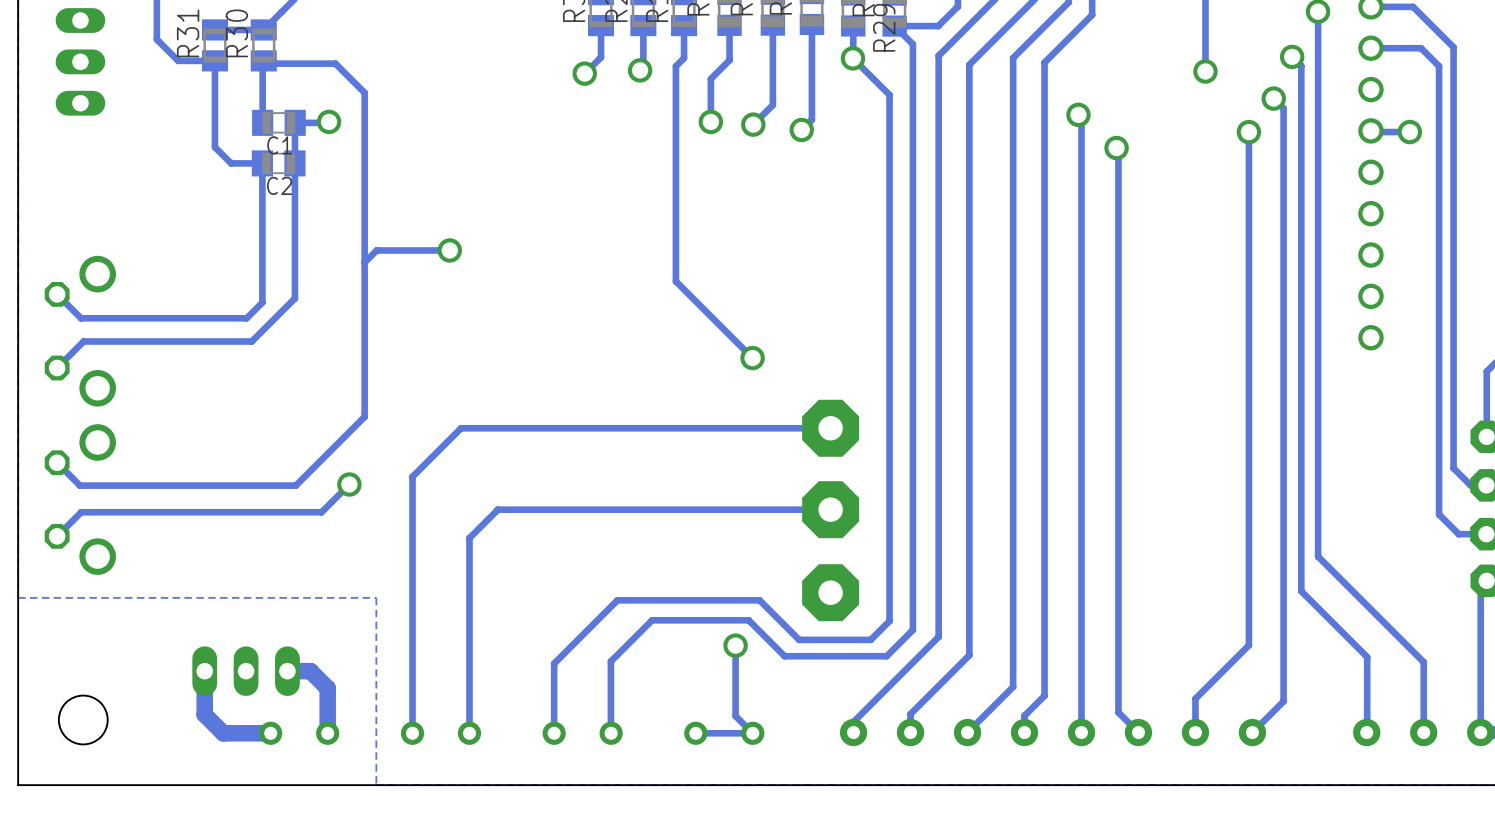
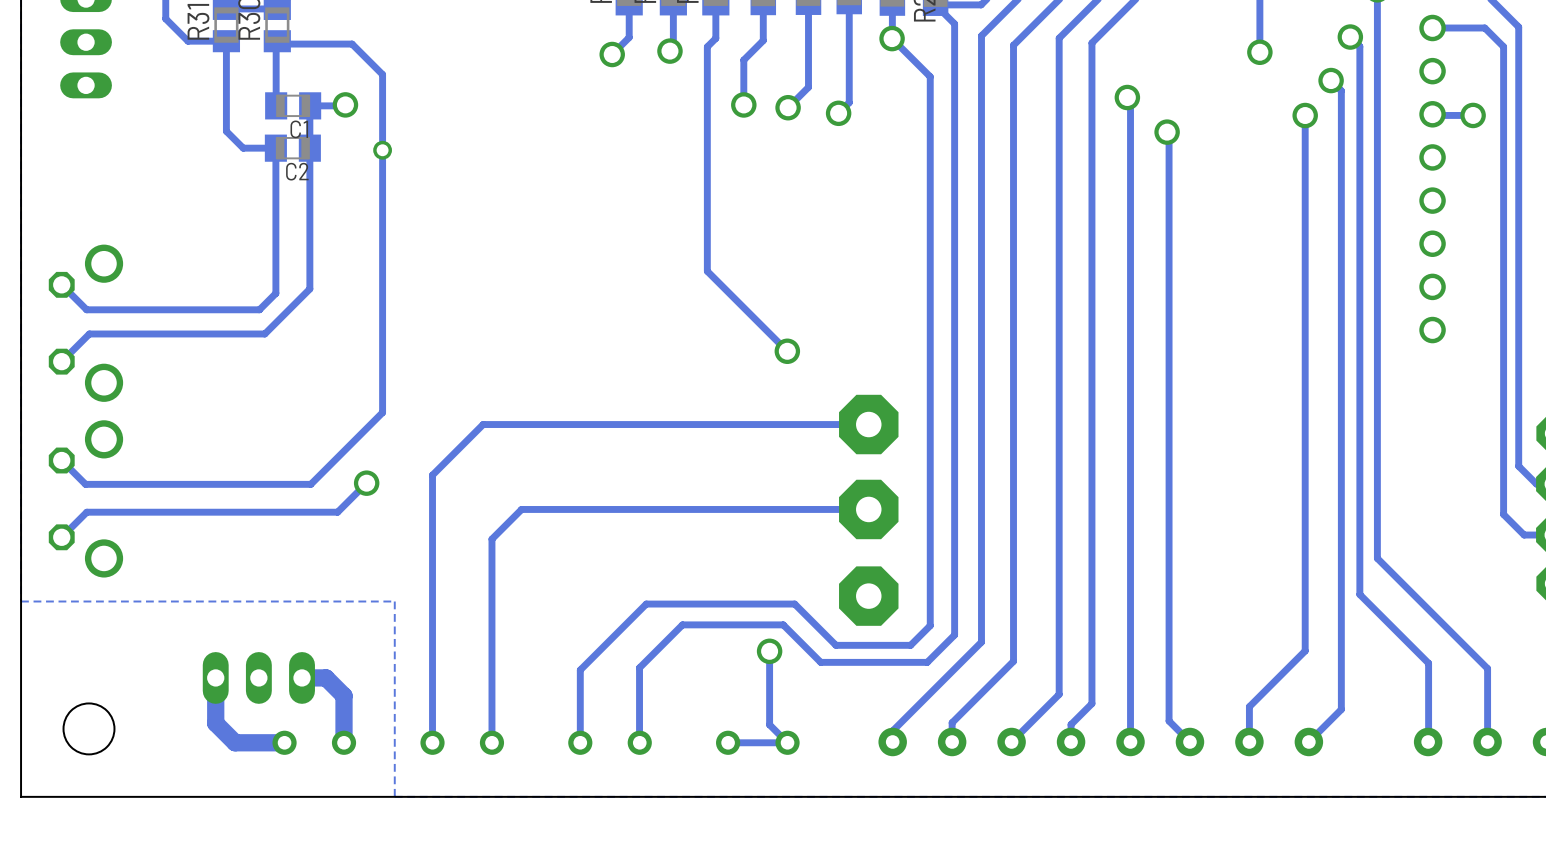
via: none -> (382, 150)
track: (449, 250) (376, 250) (364, 262) -> none
via: (449, 250) -> none

